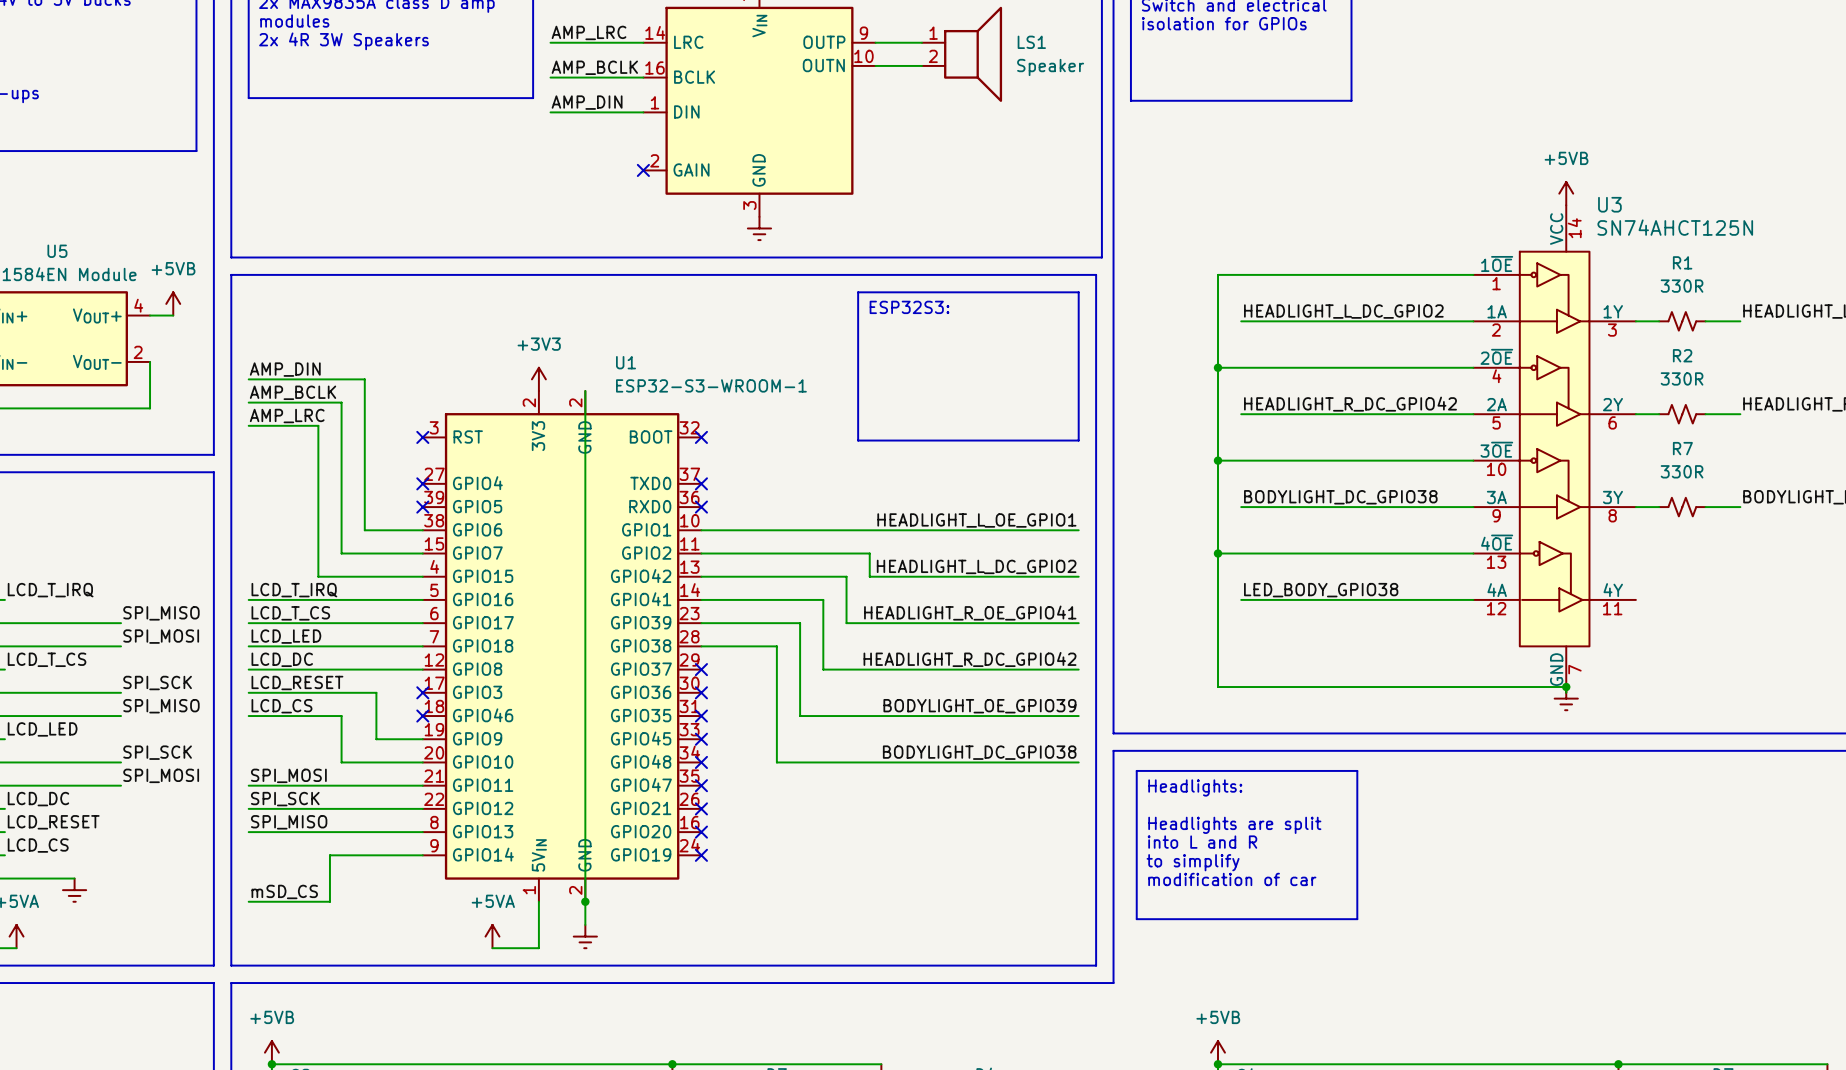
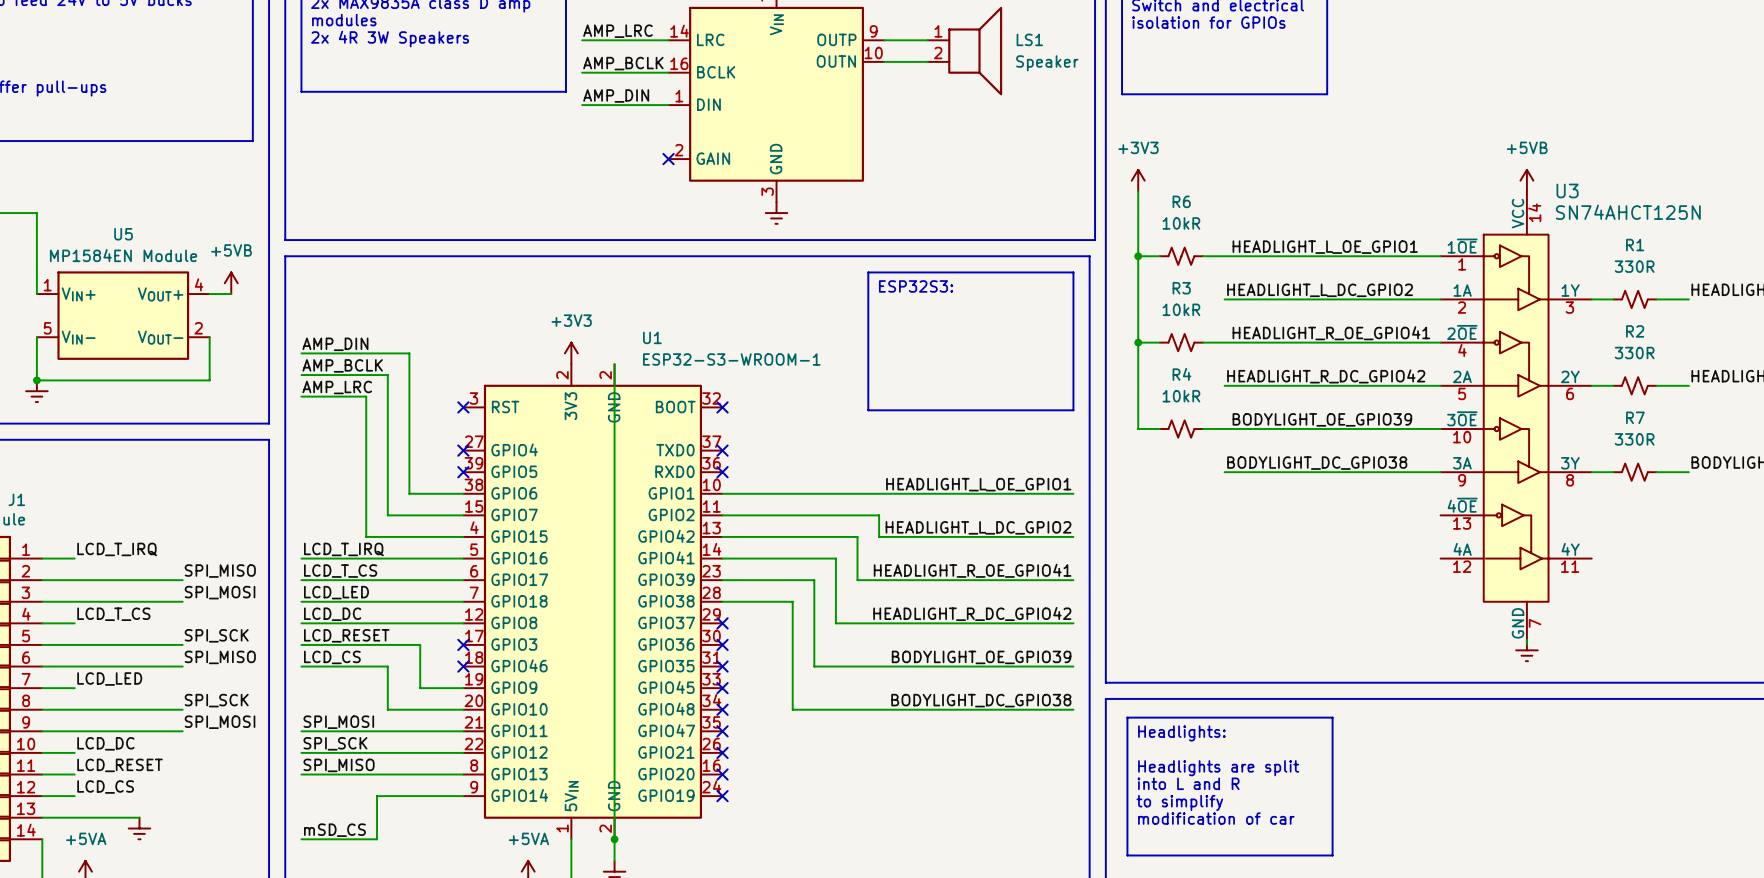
power symbol: none -> +3V3 (1138, 180)
wire: none -> (1138, 191) (1138, 429) (1159, 429)
label: none -> HEADLIGHT_L_OE_GPIO1 (1325, 247)
wire: none -> (1138, 256) (1159, 256)
junction: none -> (1138, 256)
R6: none -> 10kR (1181, 256)
wire: (1218, 274) (1218, 687) (1566, 687) -> none
label: none -> HEADLIGHT_R_OE_GPIO41 (1331, 333)
wire: none -> (1138, 342) (1159, 342)
junction: none -> (1138, 342)
R3: none -> 10kR (1181, 342)
junction: (1218, 367) -> none
label: none -> BODYLIGHT_OE_GPIO39 (1322, 419)
R4: none -> 10kR (1181, 429)
junction: (1218, 460) -> none
wire: (1218, 553) (1473, 553) -> none
junction: (1218, 553) -> none
label: LED_BODY_GPIO38 (1321, 590) -> none
wire: (1241, 599) (1473, 599) -> none
junction: (1566, 687) -> none

